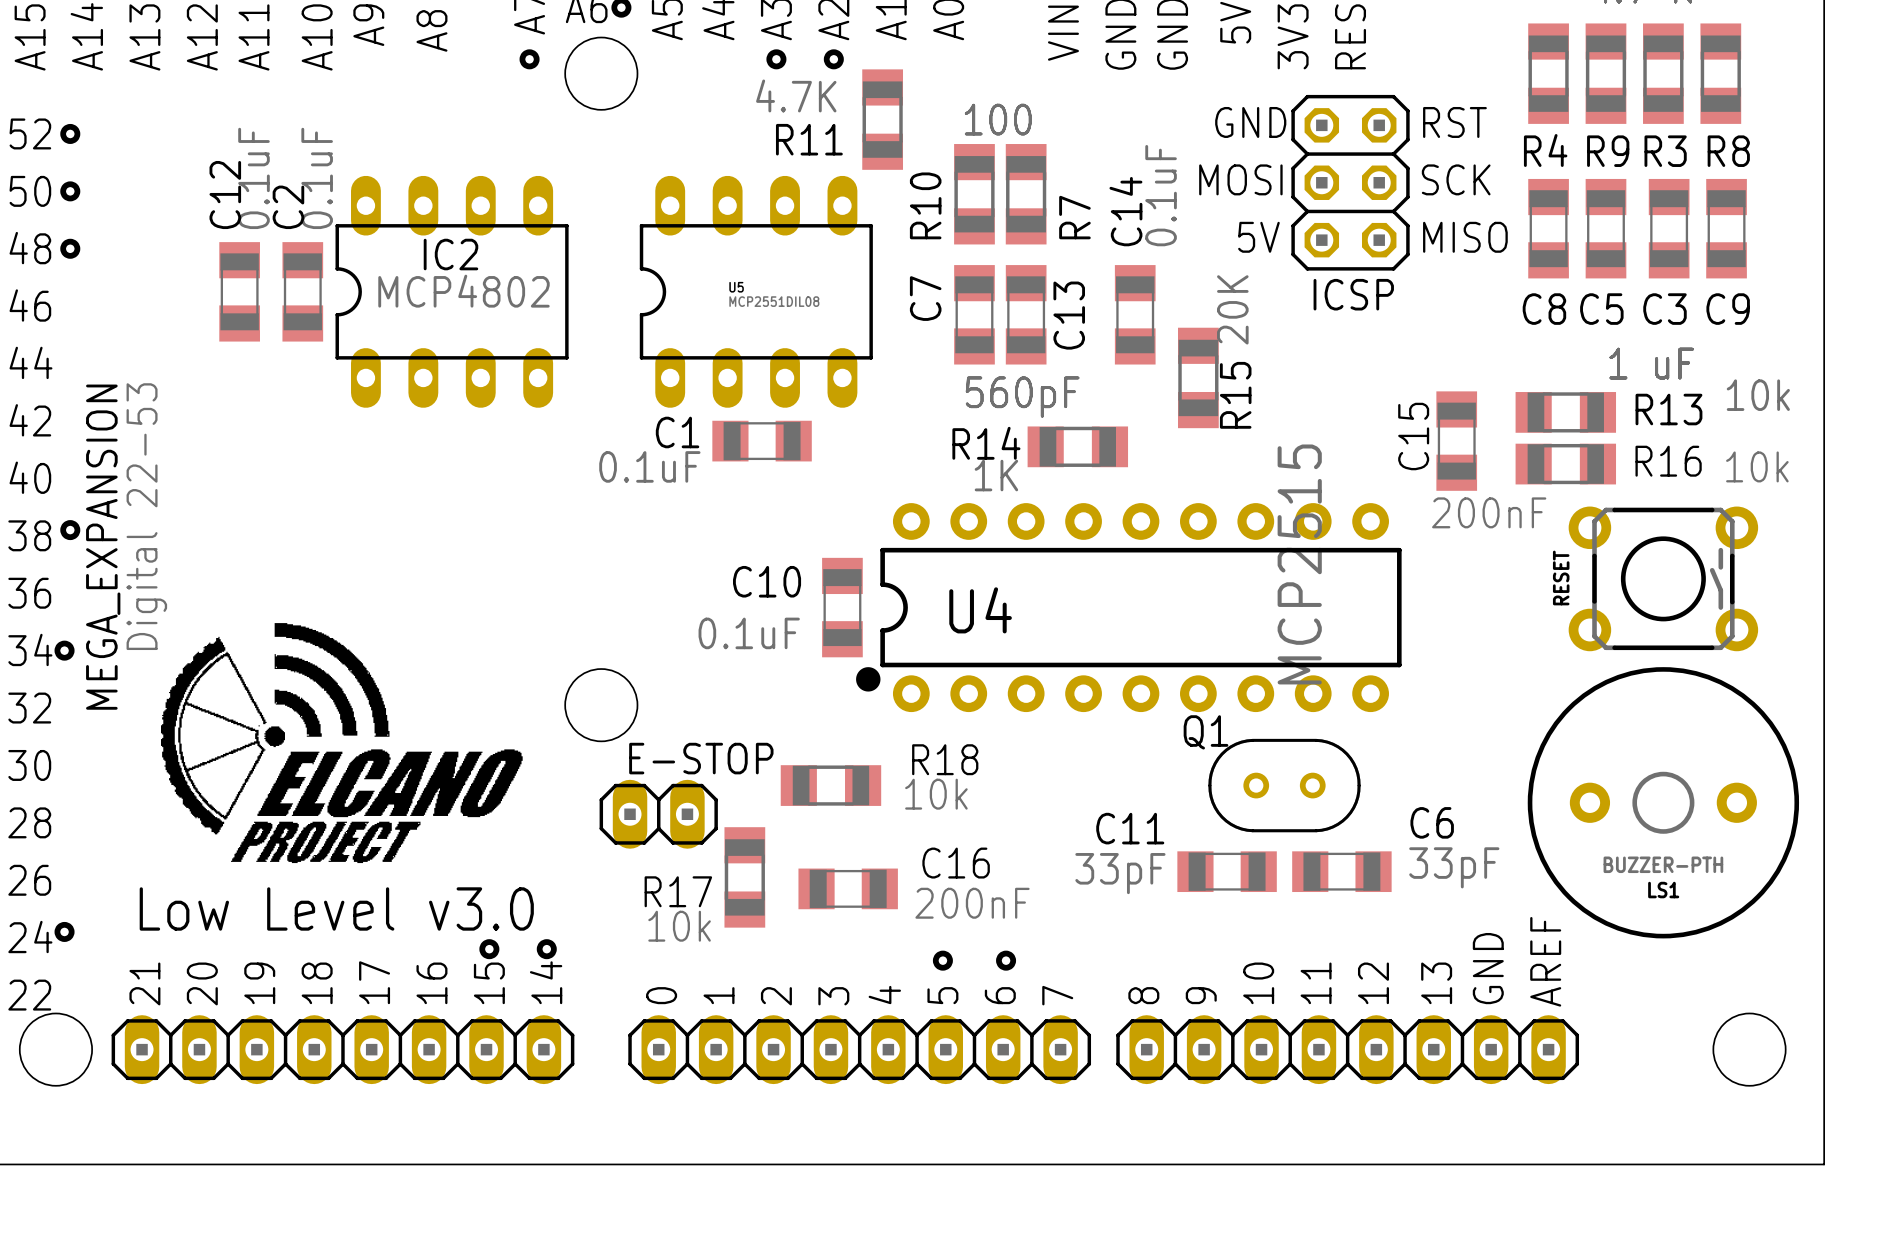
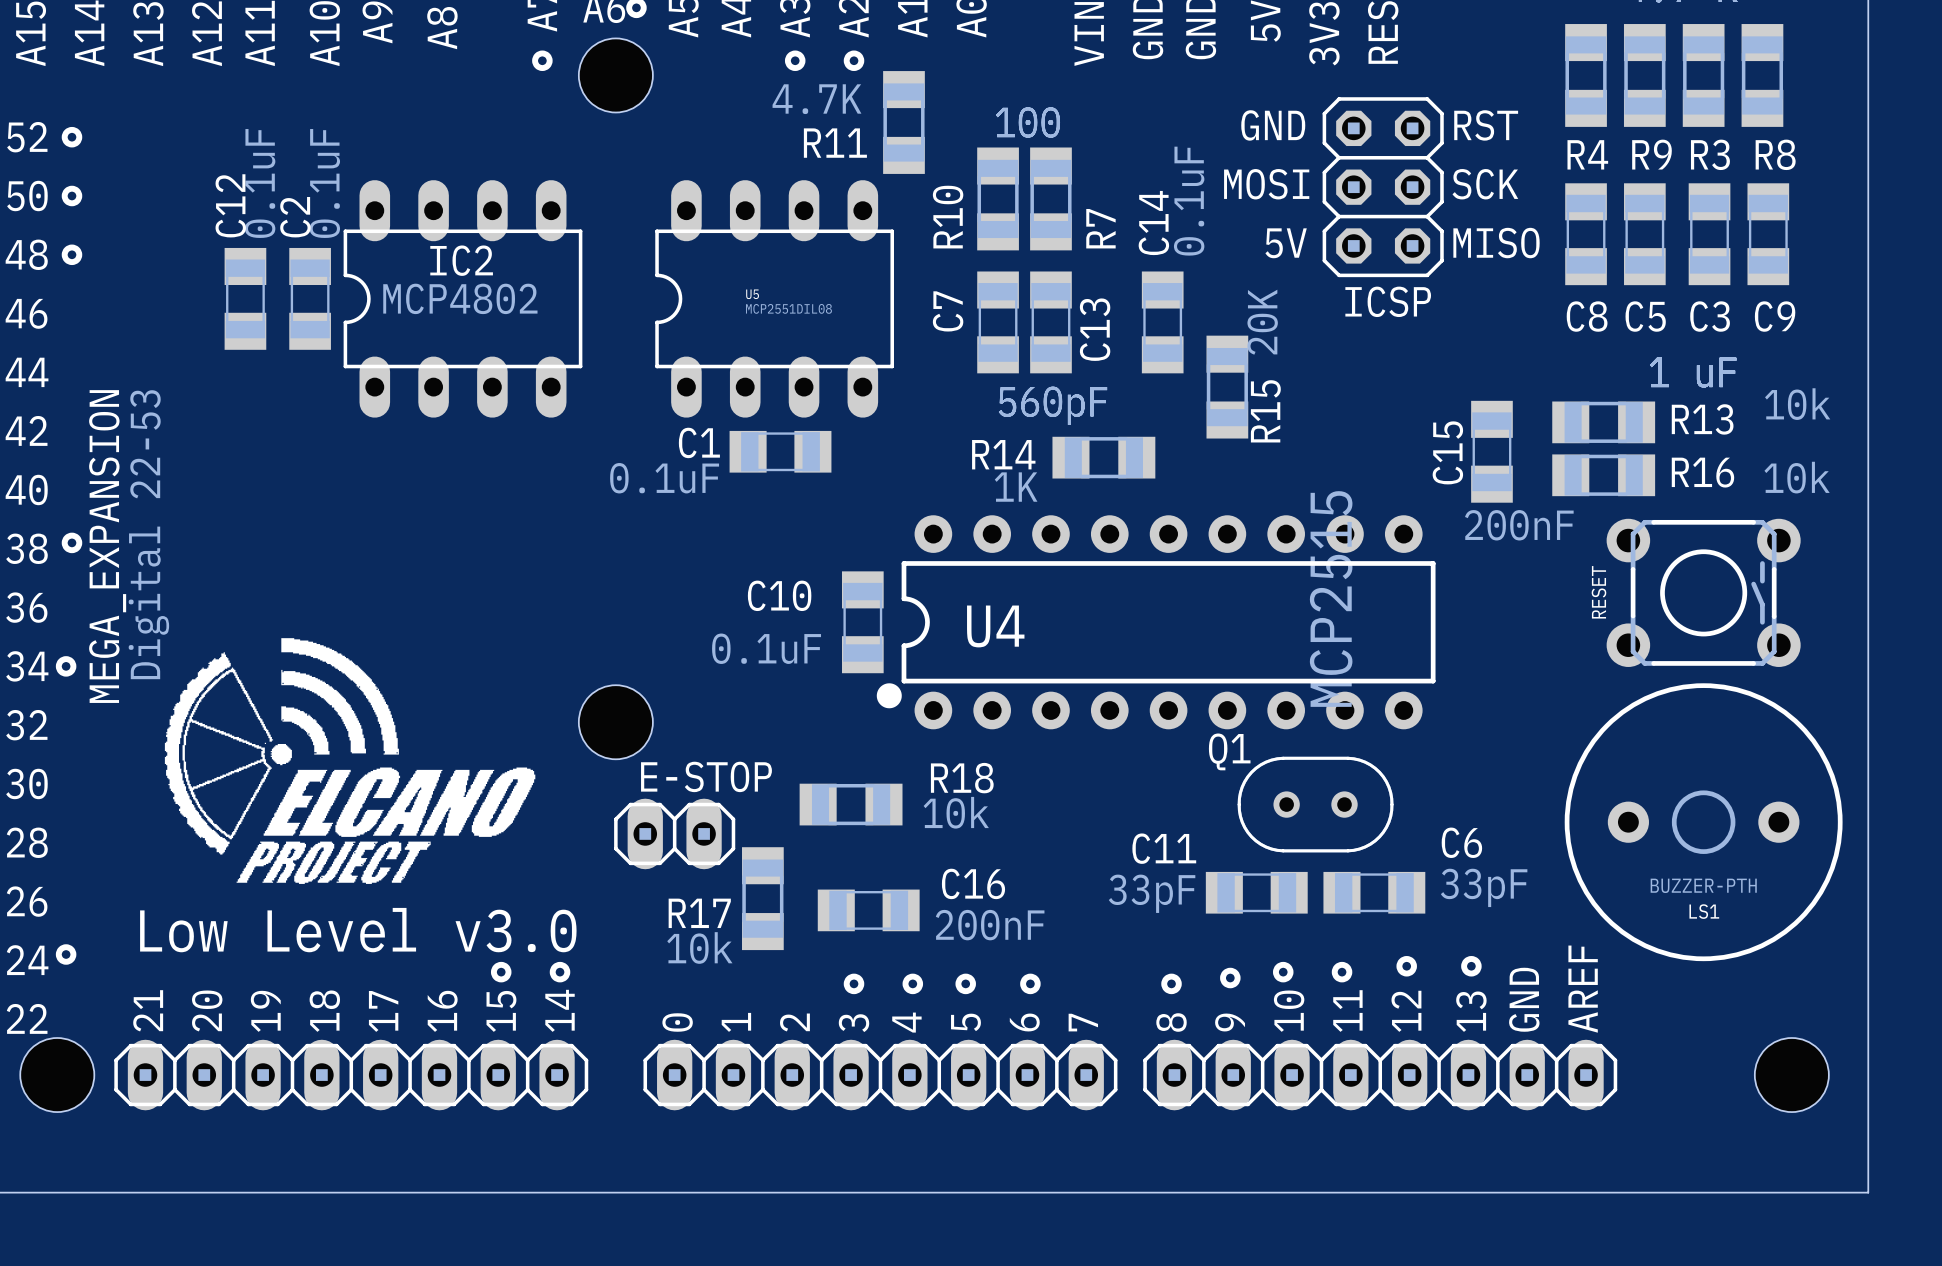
drawing: none -> [1396, 956, 1417, 977]
drawing: none -> [1461, 956, 1482, 977]
drawing: none -> [1272, 961, 1294, 983]
drawing: none -> [1331, 961, 1353, 983]
drawing: none -> [1220, 967, 1241, 989]
drawing: none -> [843, 973, 865, 995]
drawing: none -> [902, 973, 924, 995]
drawing: none -> [1161, 973, 1182, 995]

